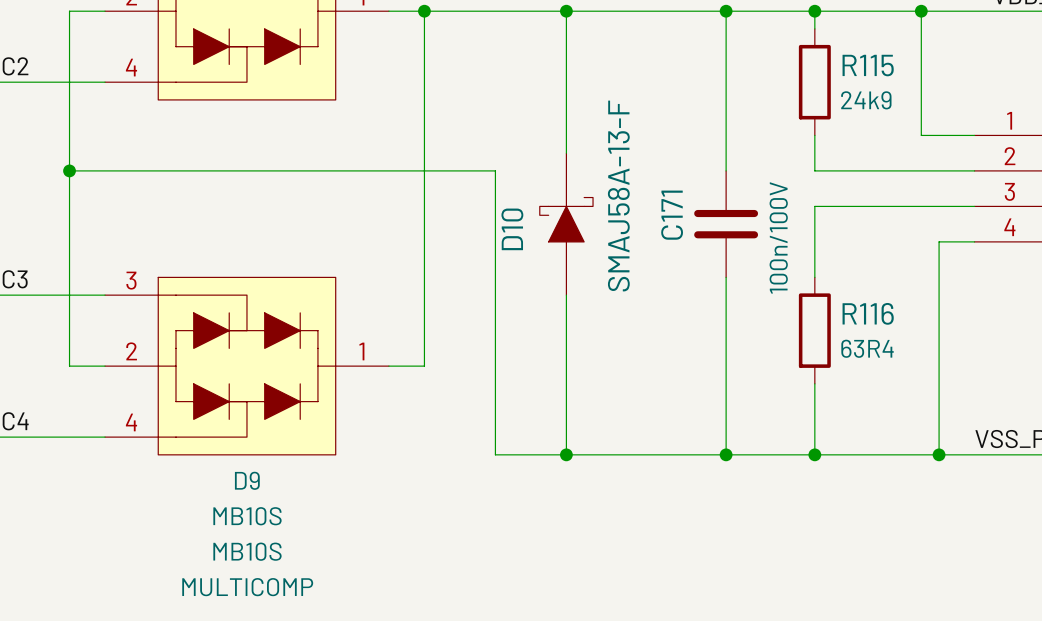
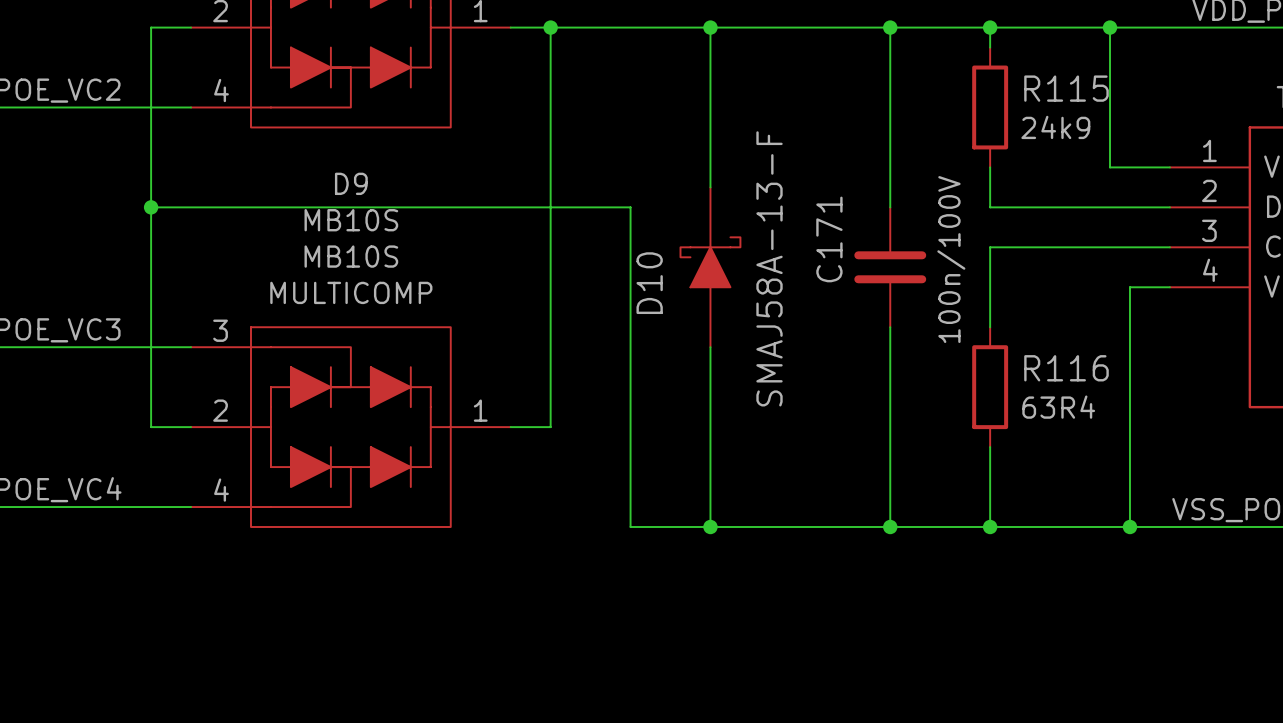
D9 name position: D9 (247, 480) -> D9 (351, 183)
D9 value position: MB10S (247, 516) -> MB10S (351, 220)
D9 text position: MB10S (247, 551) -> MB10S (351, 256)
D9 text position: MULTICOMP (247, 587) -> MULTICOMP (351, 292)

